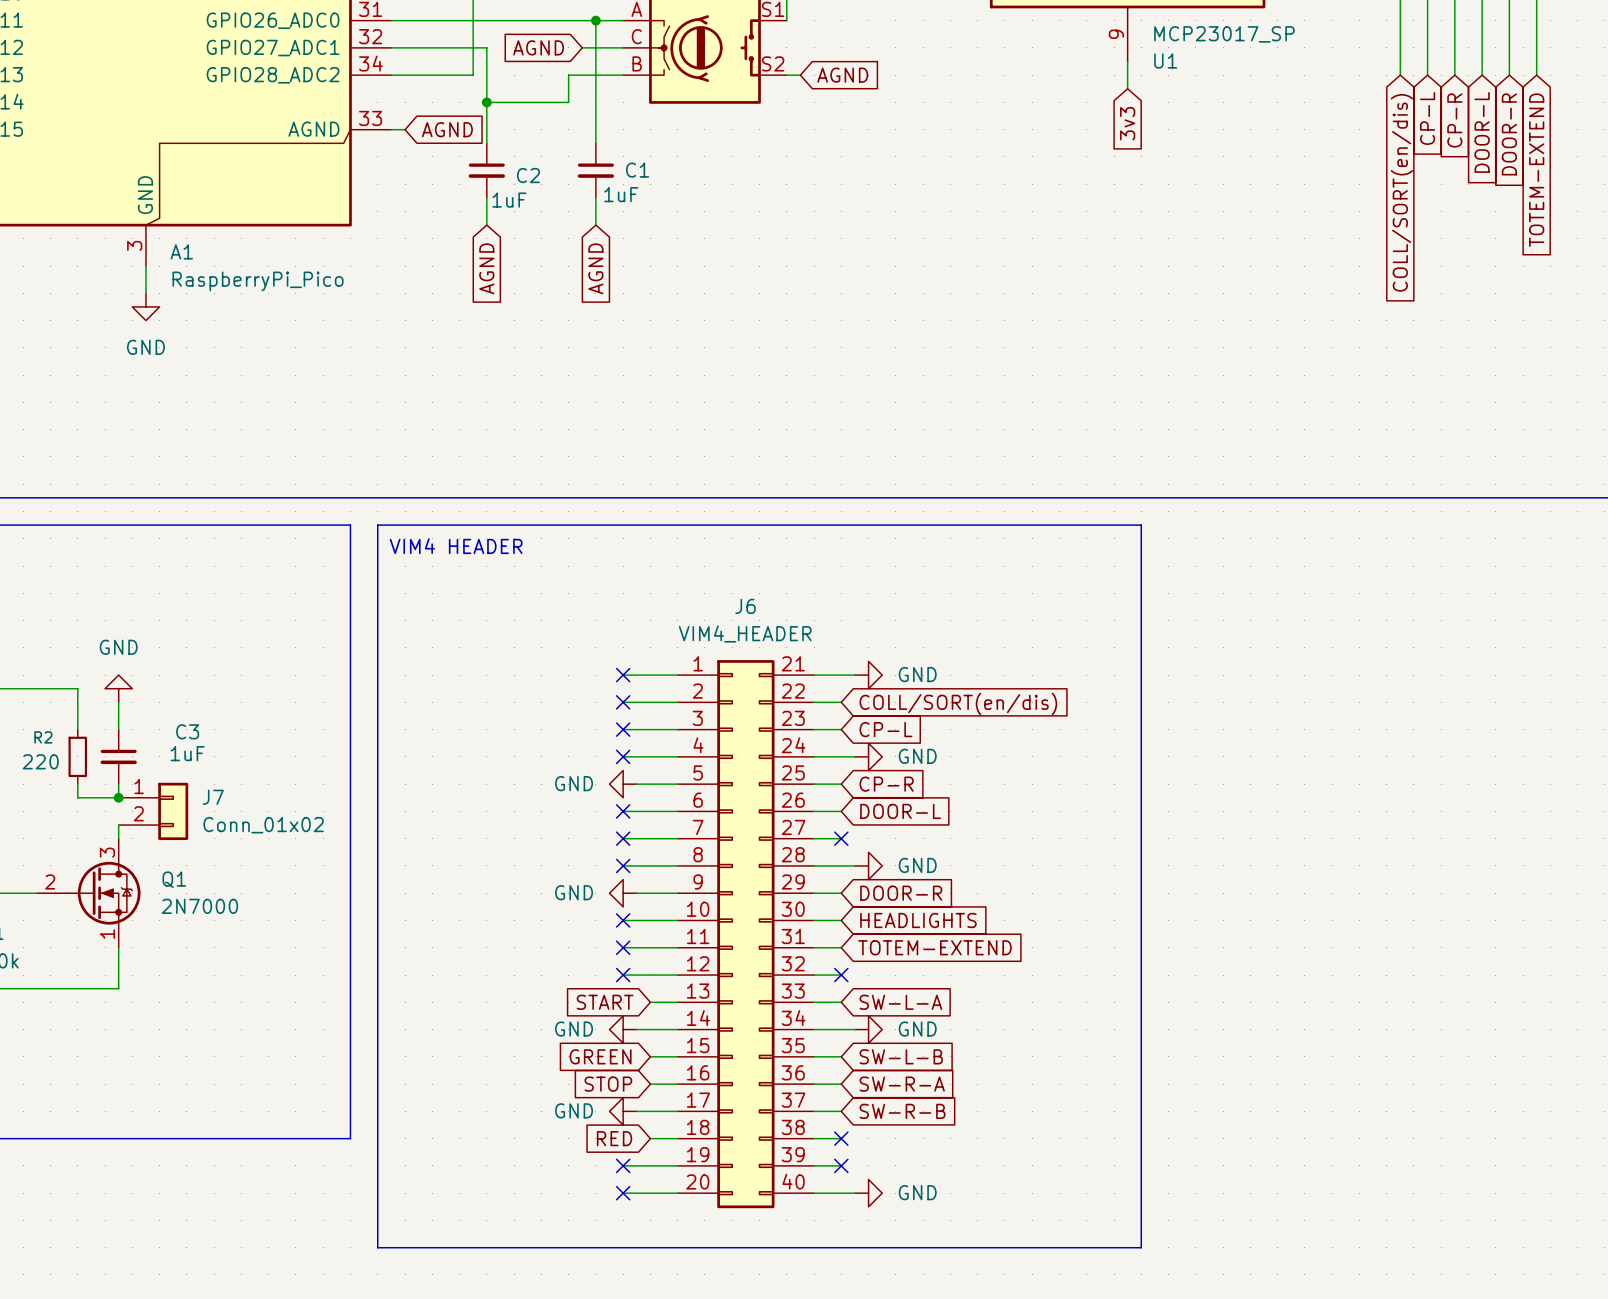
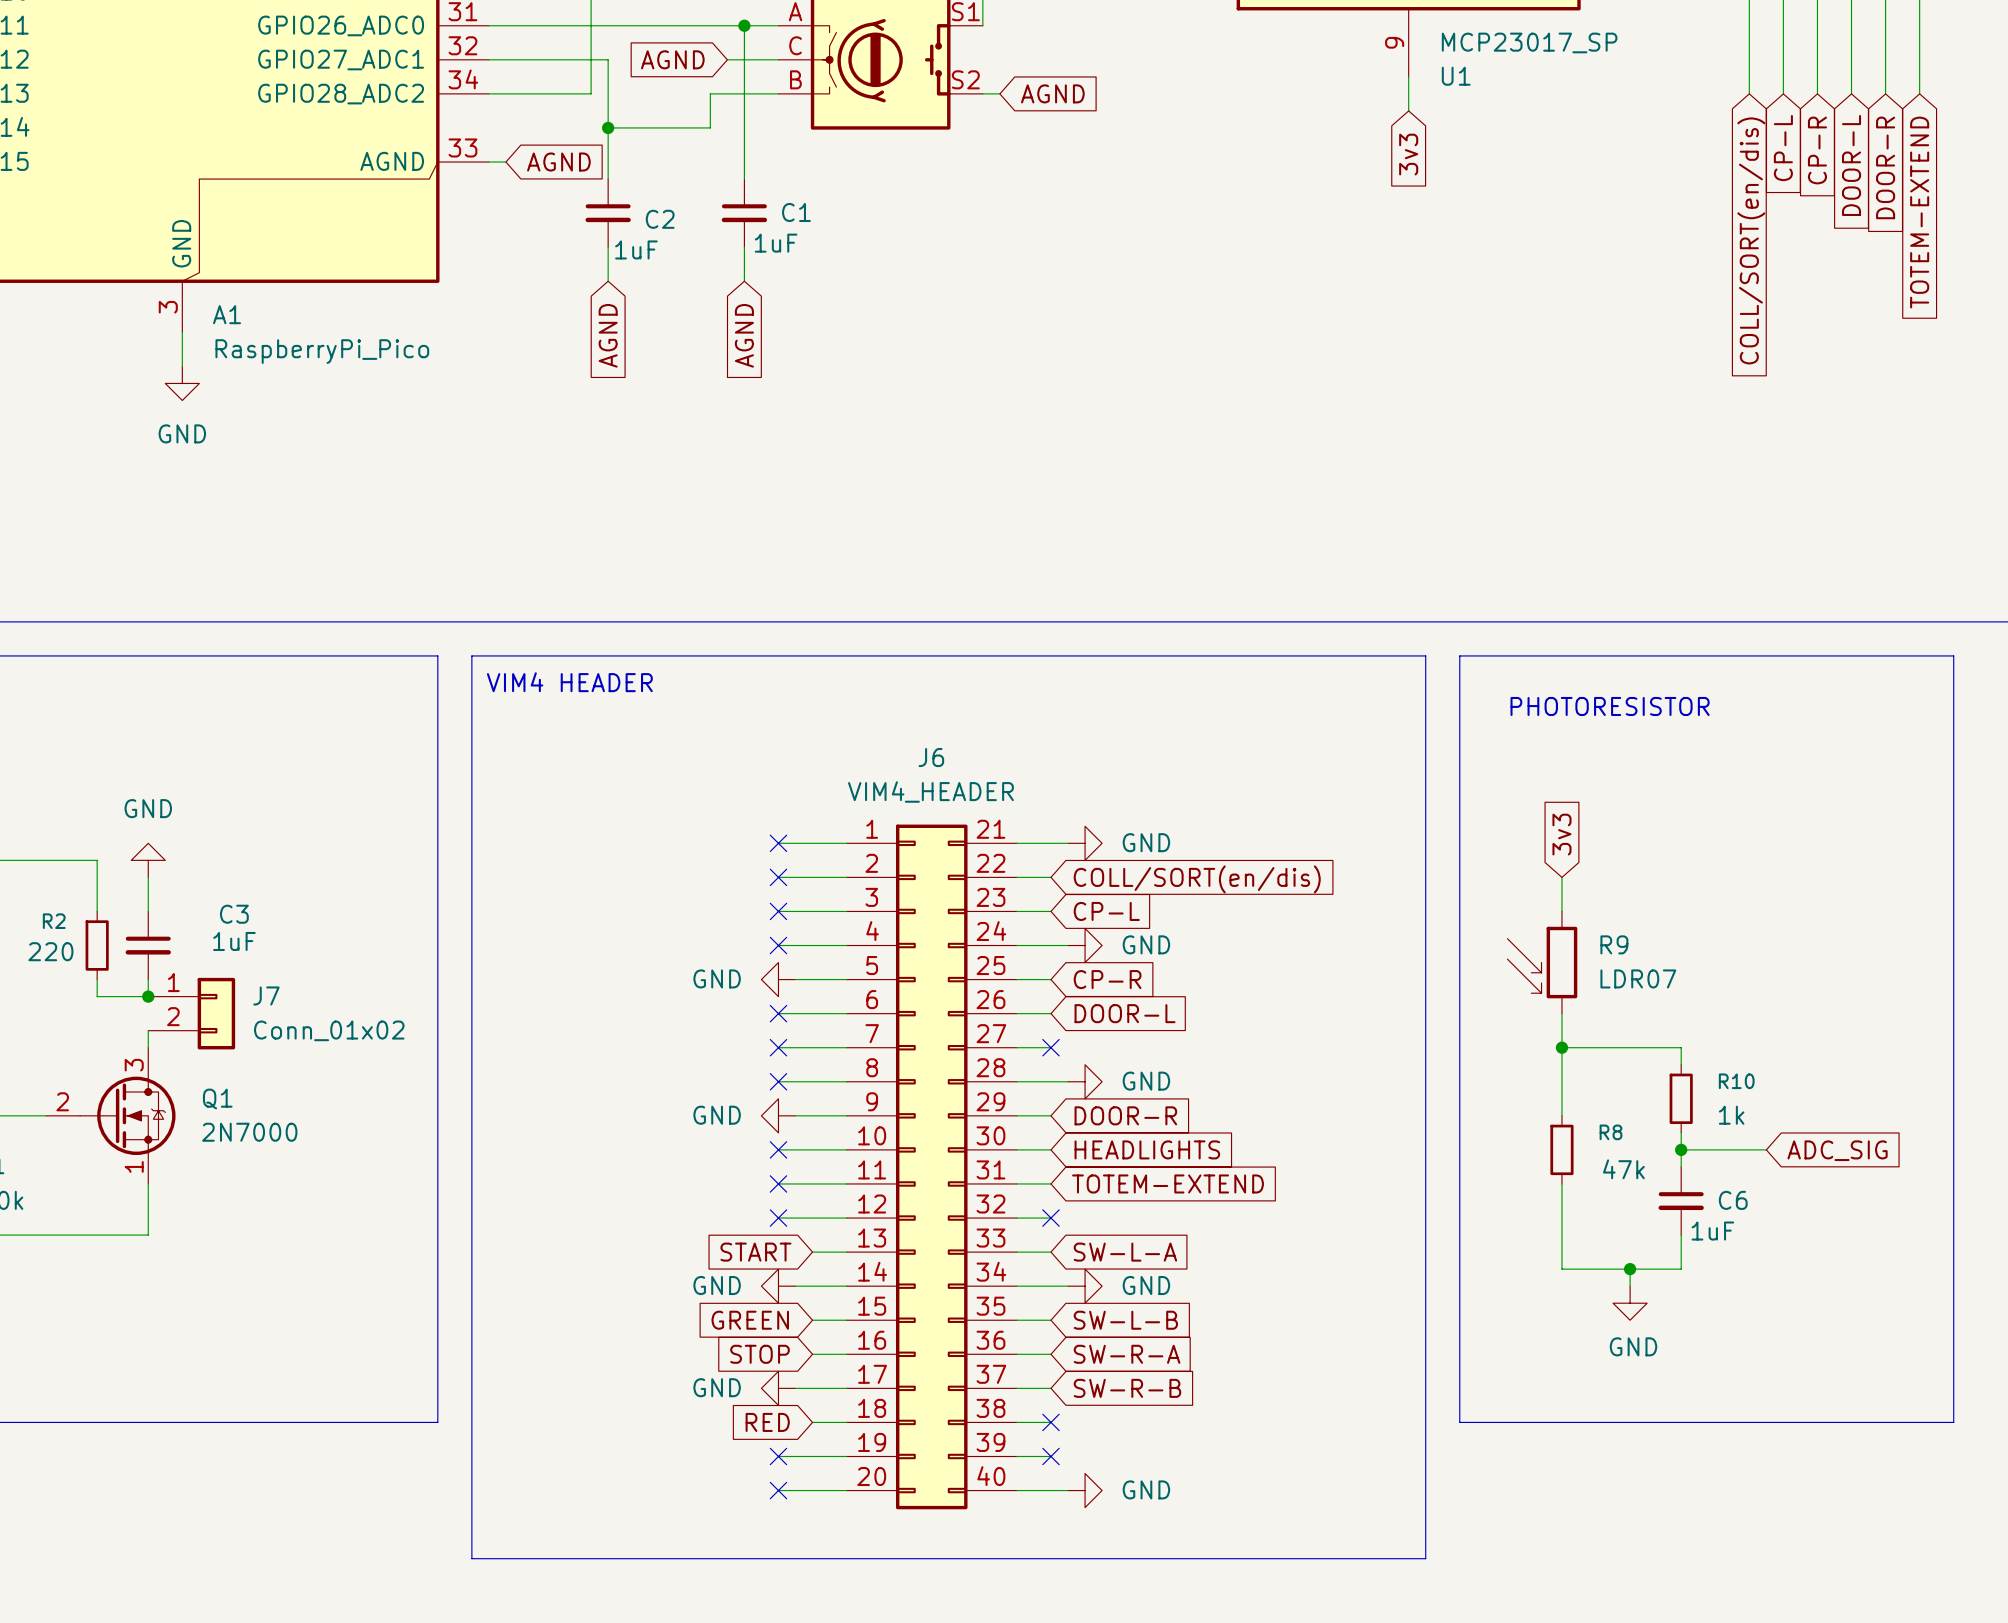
line: none -> (1459, 655) (1953, 655) (1953, 1422) (1459, 1422) (1459, 655)
text: none -> PHOTORESISTOR (1610, 706)
global label: none -> 3v3 (1561, 834)
wire: none -> (1561, 877) (1561, 911)
R9: none -> LDR07 (1542, 962)
wire: none -> (1561, 1013) (1561, 1115)
wire: none -> (1561, 1047) (1681, 1047) (1681, 1064)
junction: none -> (1561, 1047)
R10: none -> 1k (1681, 1098)
wire: none -> (1681, 1132) (1681, 1166)
R8: none -> 47k (1561, 1149)
wire: none -> (1681, 1149) (1766, 1149)
junction: none -> (1681, 1149)
global label: none -> ADC_SIG (1837, 1150)
wire: none -> (1561, 1183) (1561, 1269) (1681, 1269) (1681, 1235)
C6: none -> 1uF (1681, 1201)
wire: none -> (1630, 1269) (1630, 1286)
junction: none -> (1630, 1269)
power symbol: none -> GND (1630, 1303)

